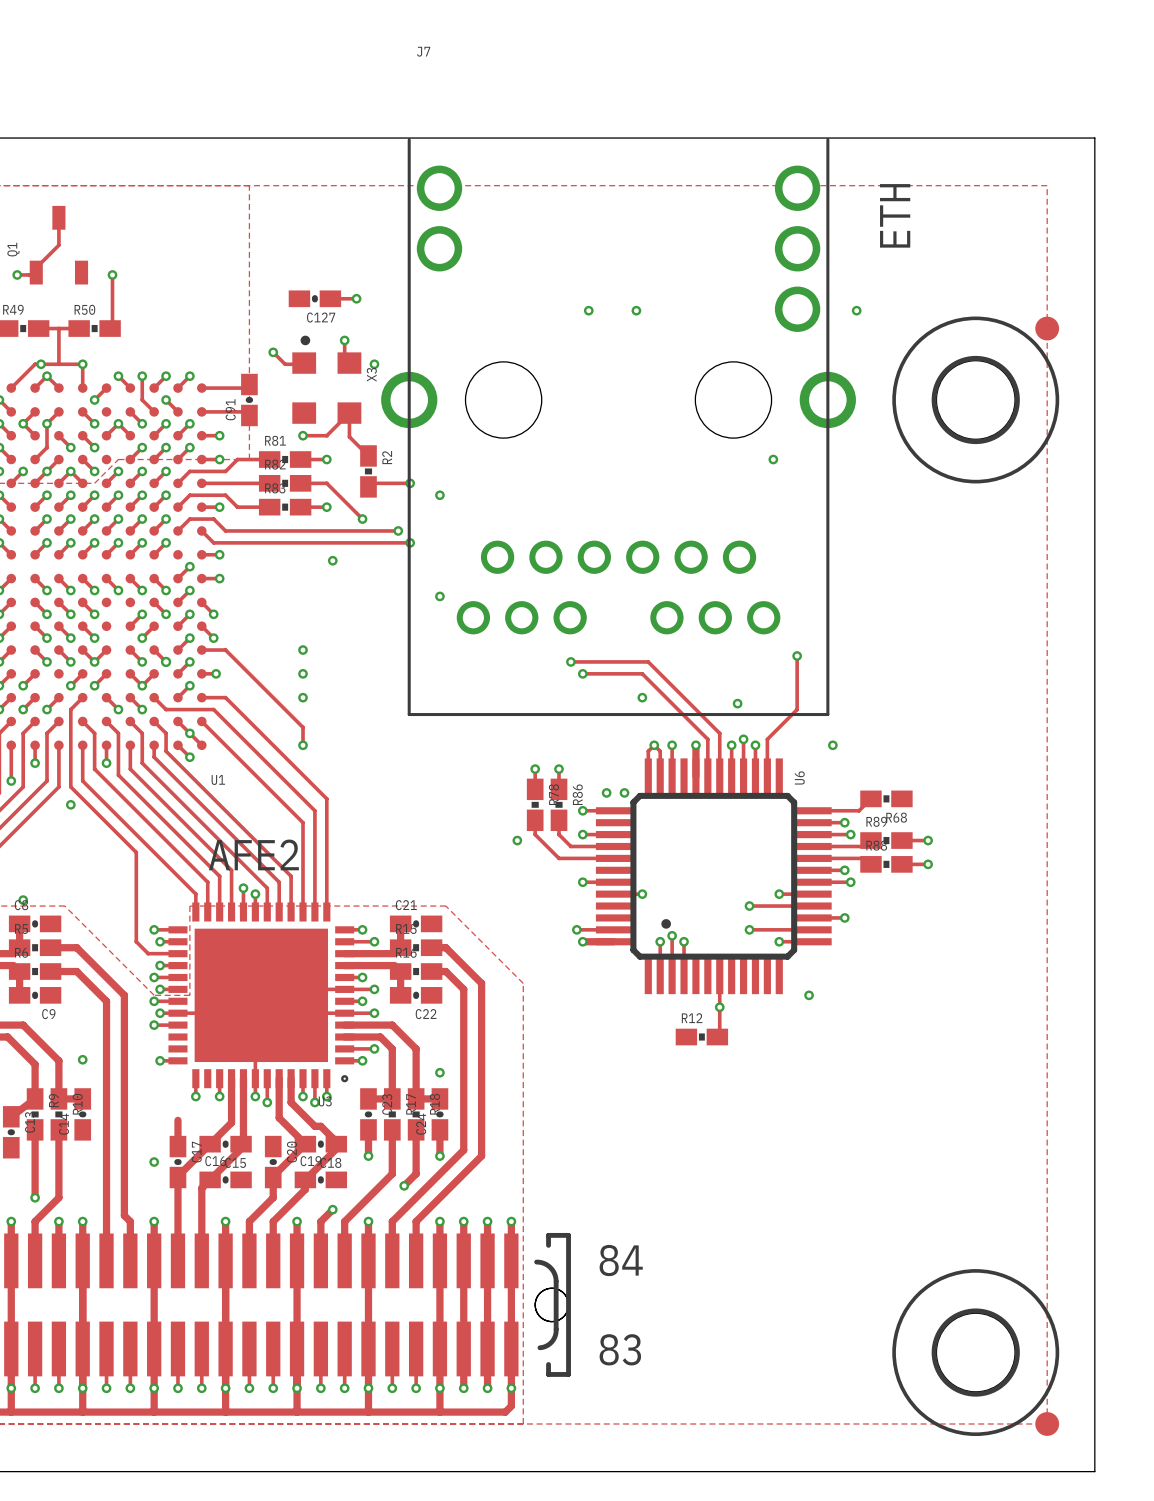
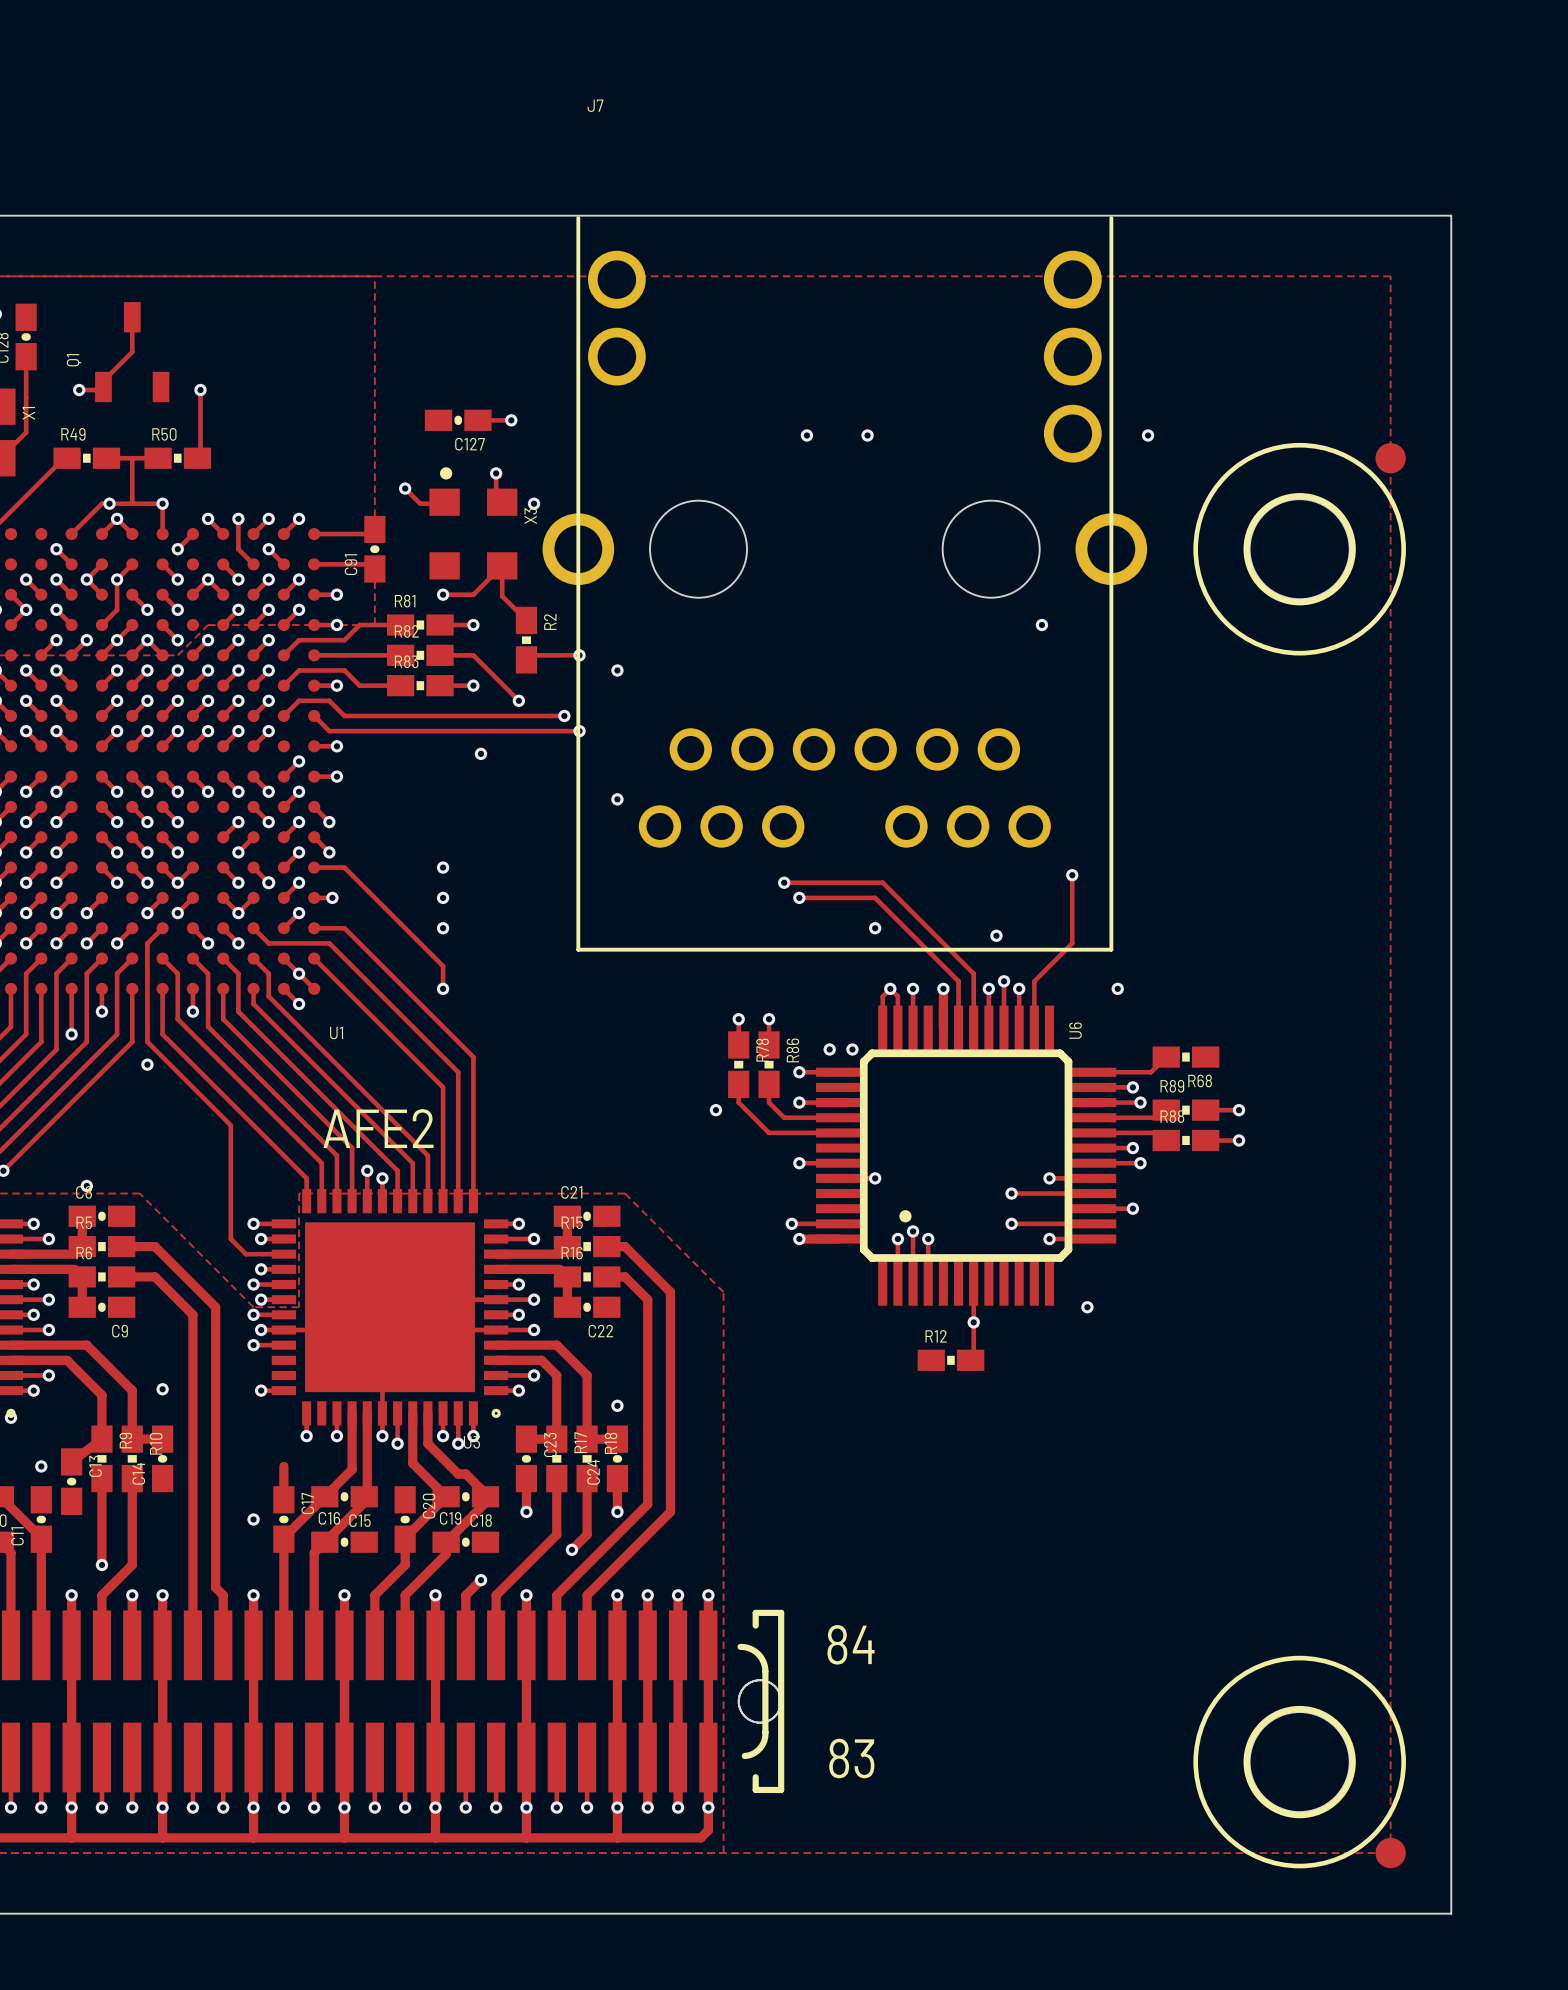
text: ETH (895, 215) -> none

